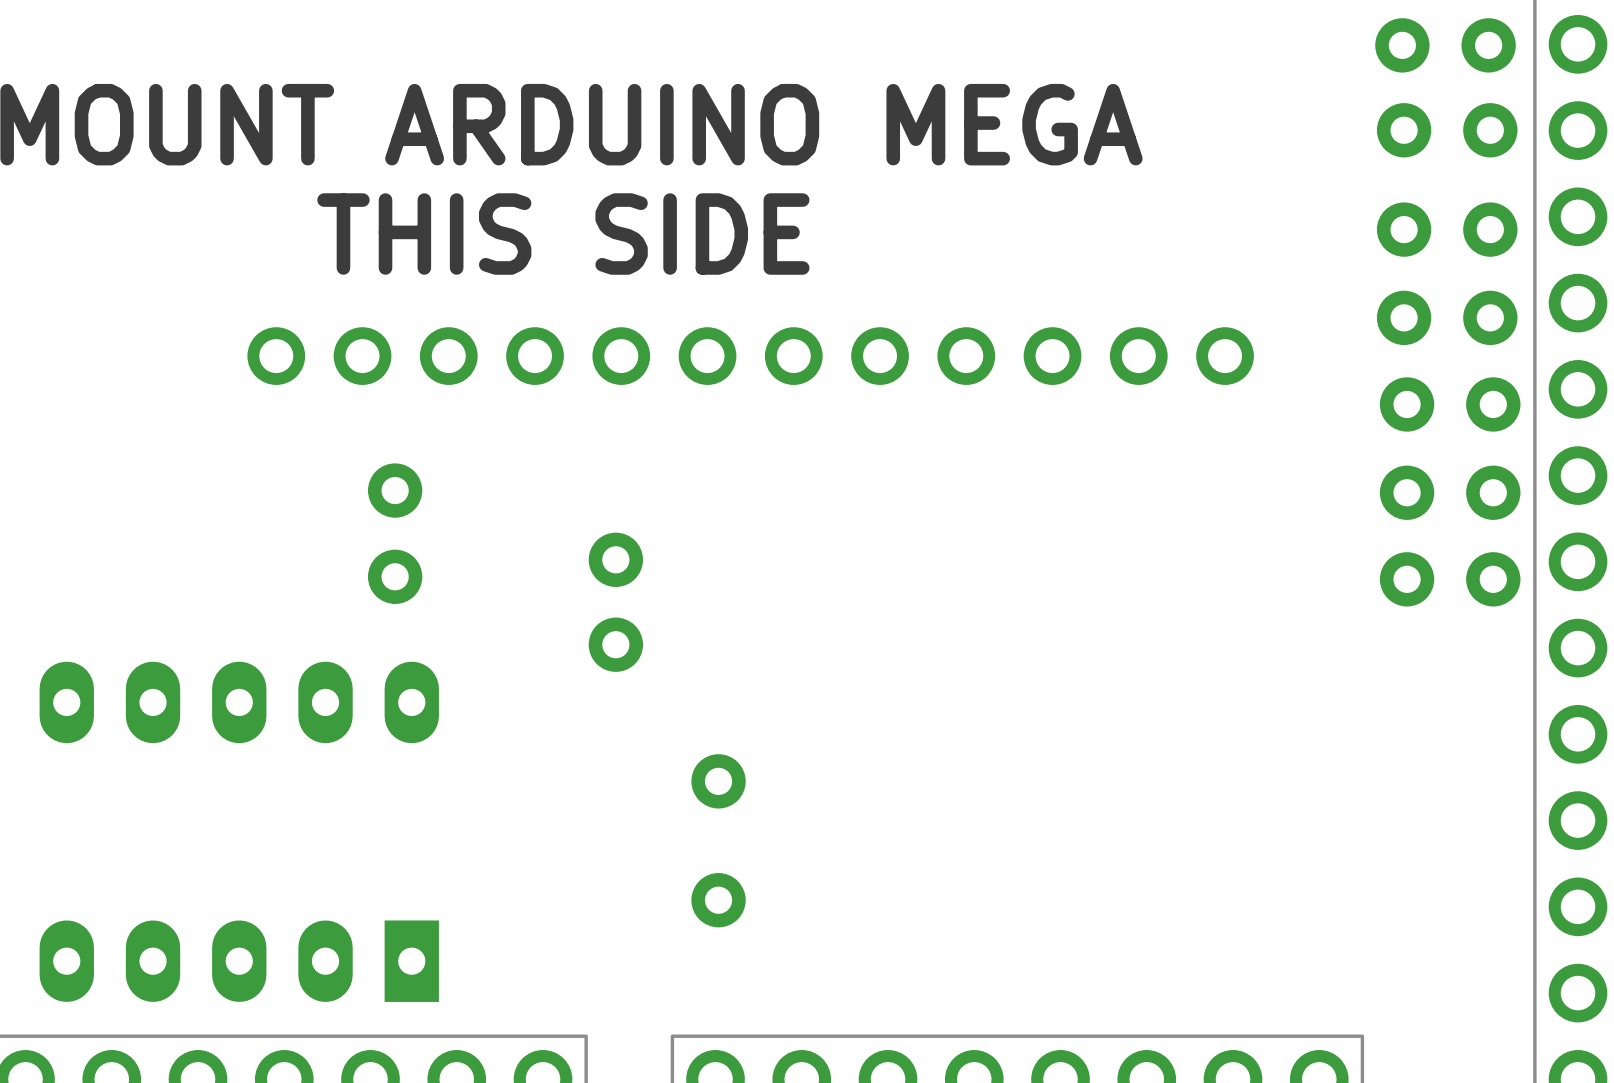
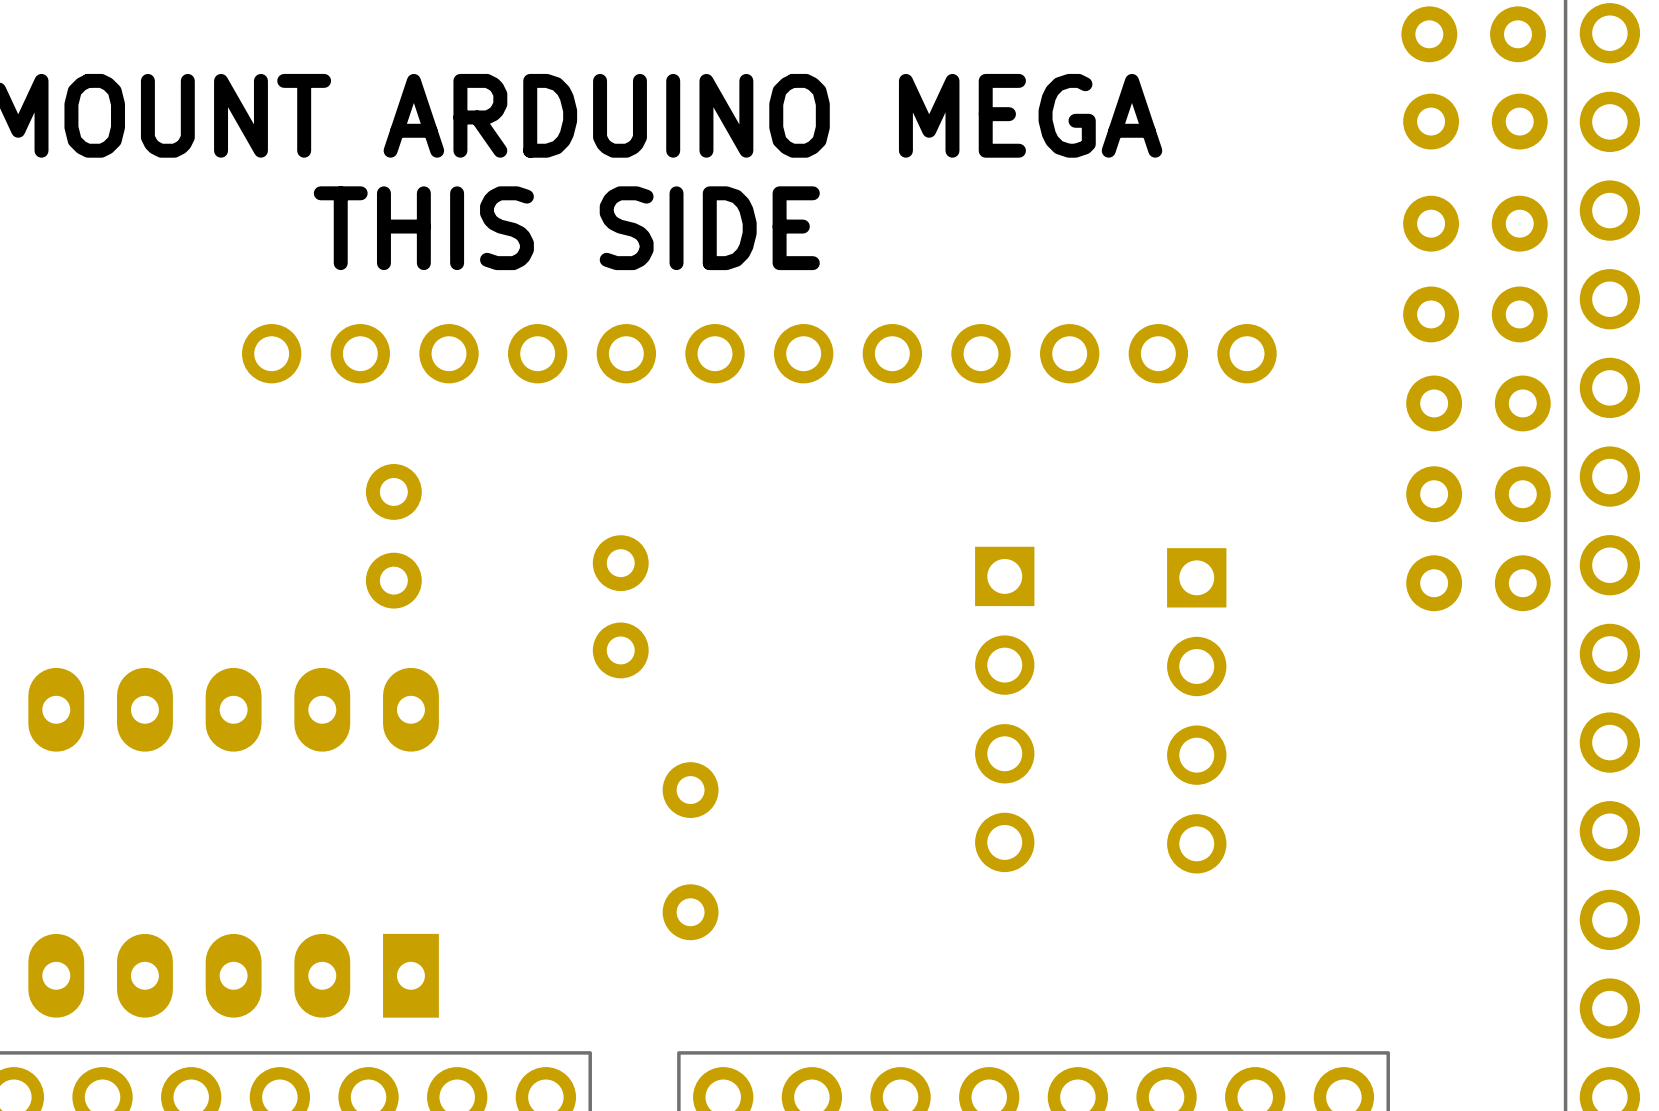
part: none -> (1004, 709)
part: none -> (1196, 710)
part position: (718, 840) -> (690, 851)

